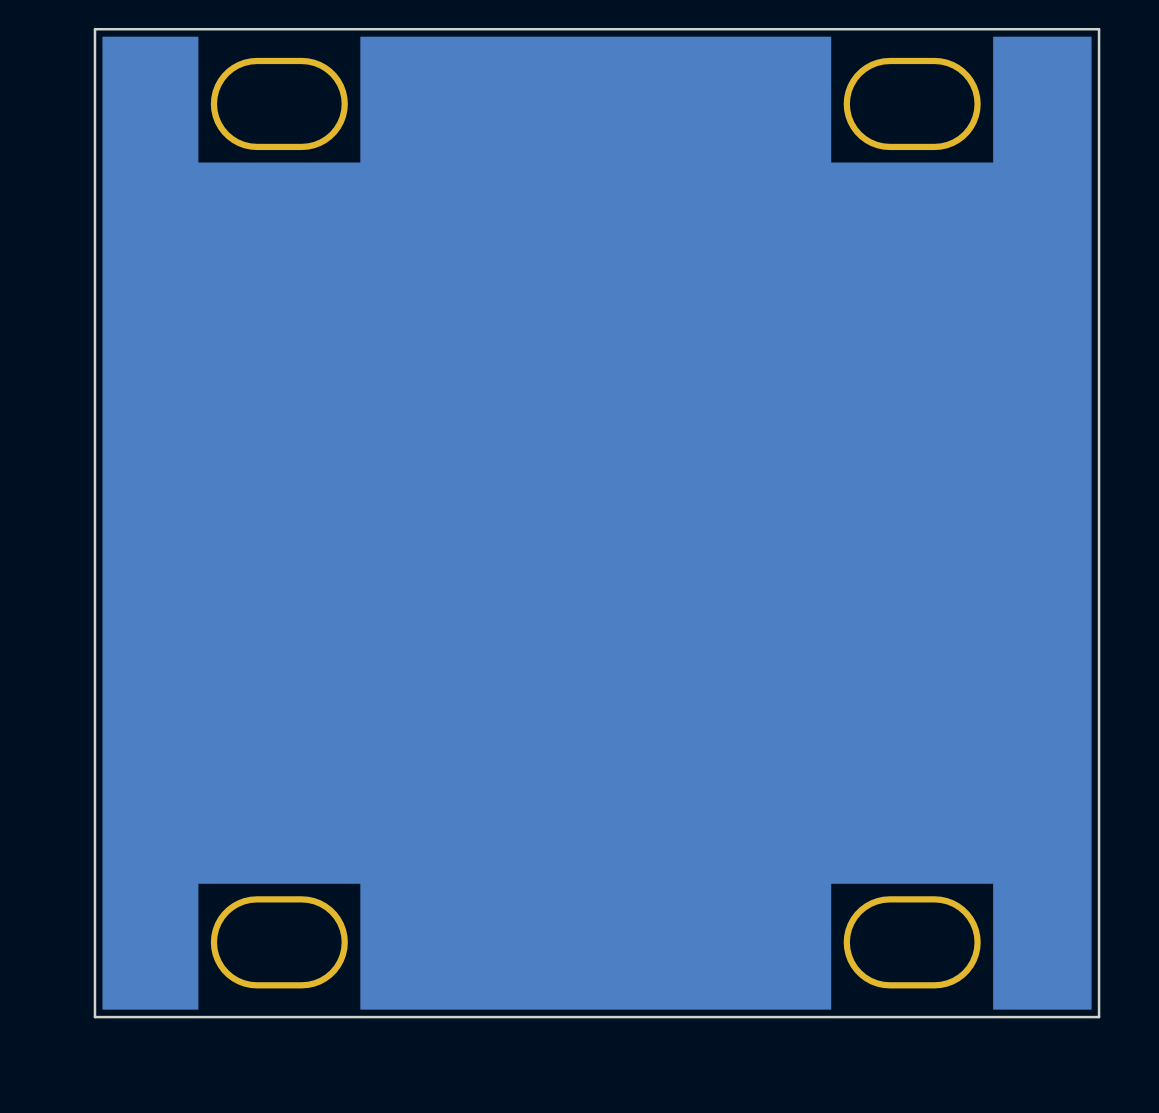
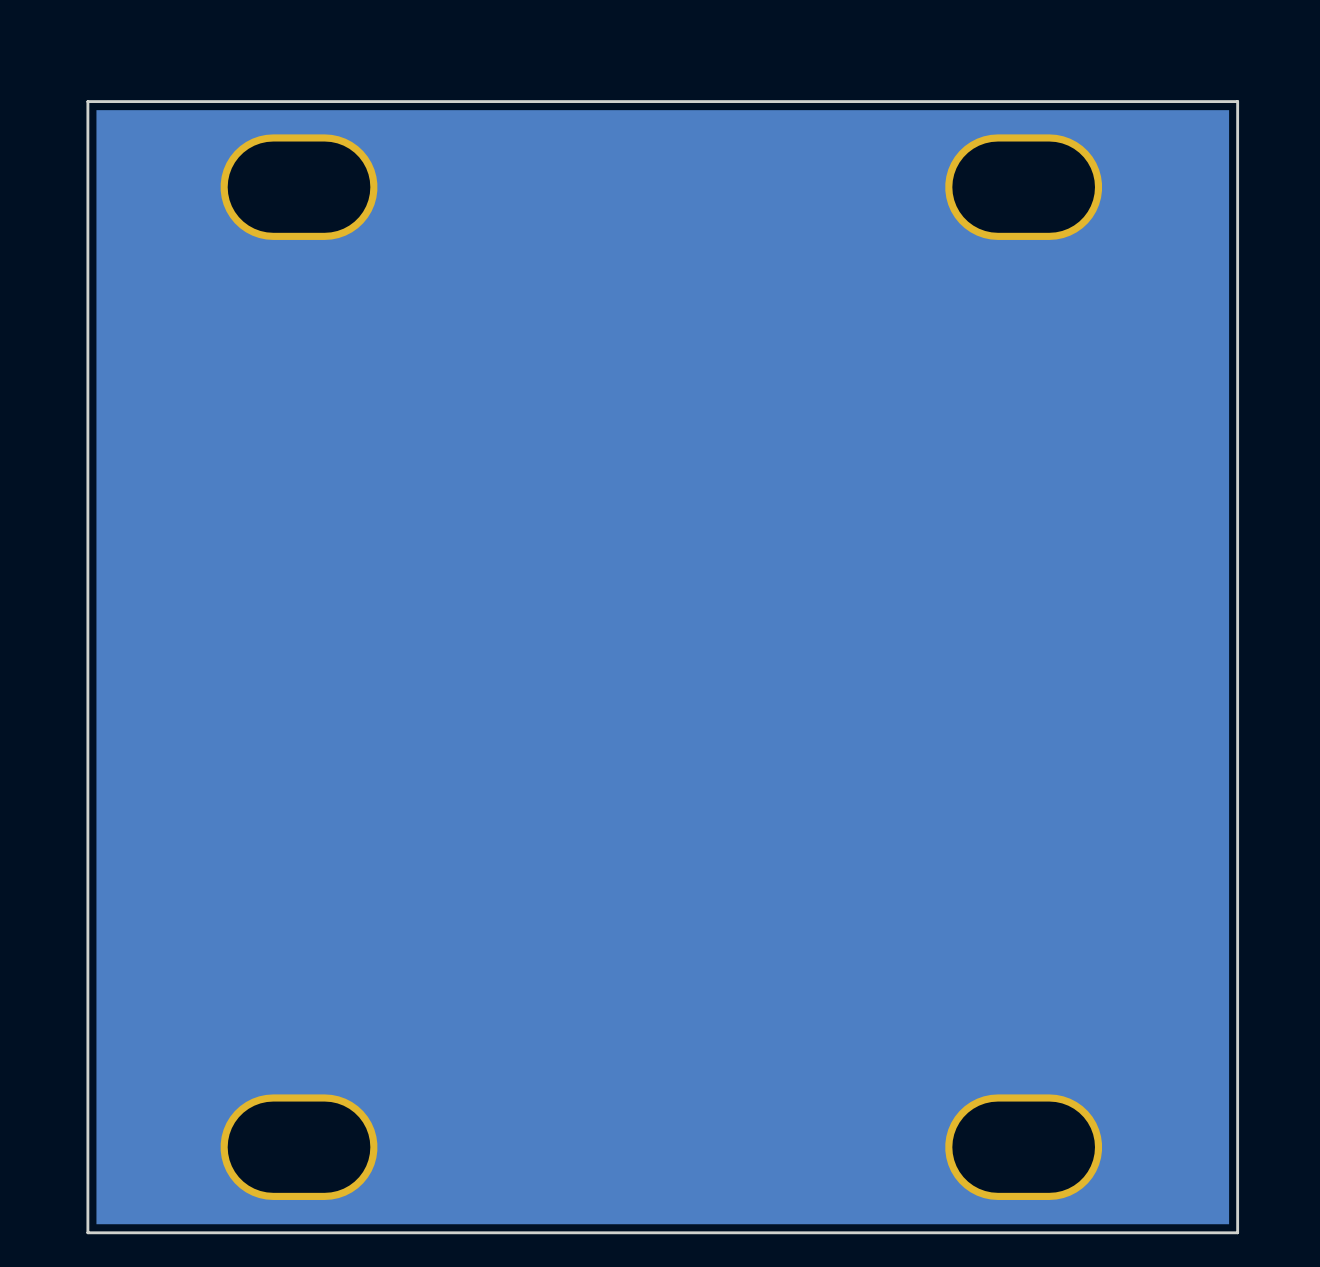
drawing: [102, 36, 199, 1010] -> none
drawing: [360, 36, 832, 163] -> none
drawing: [993, 36, 1092, 1010] -> none
drawing shape: [198, 162, 994, 884] -> [96, 110, 1230, 1225]
drawing: [360, 883, 832, 1010] -> none

